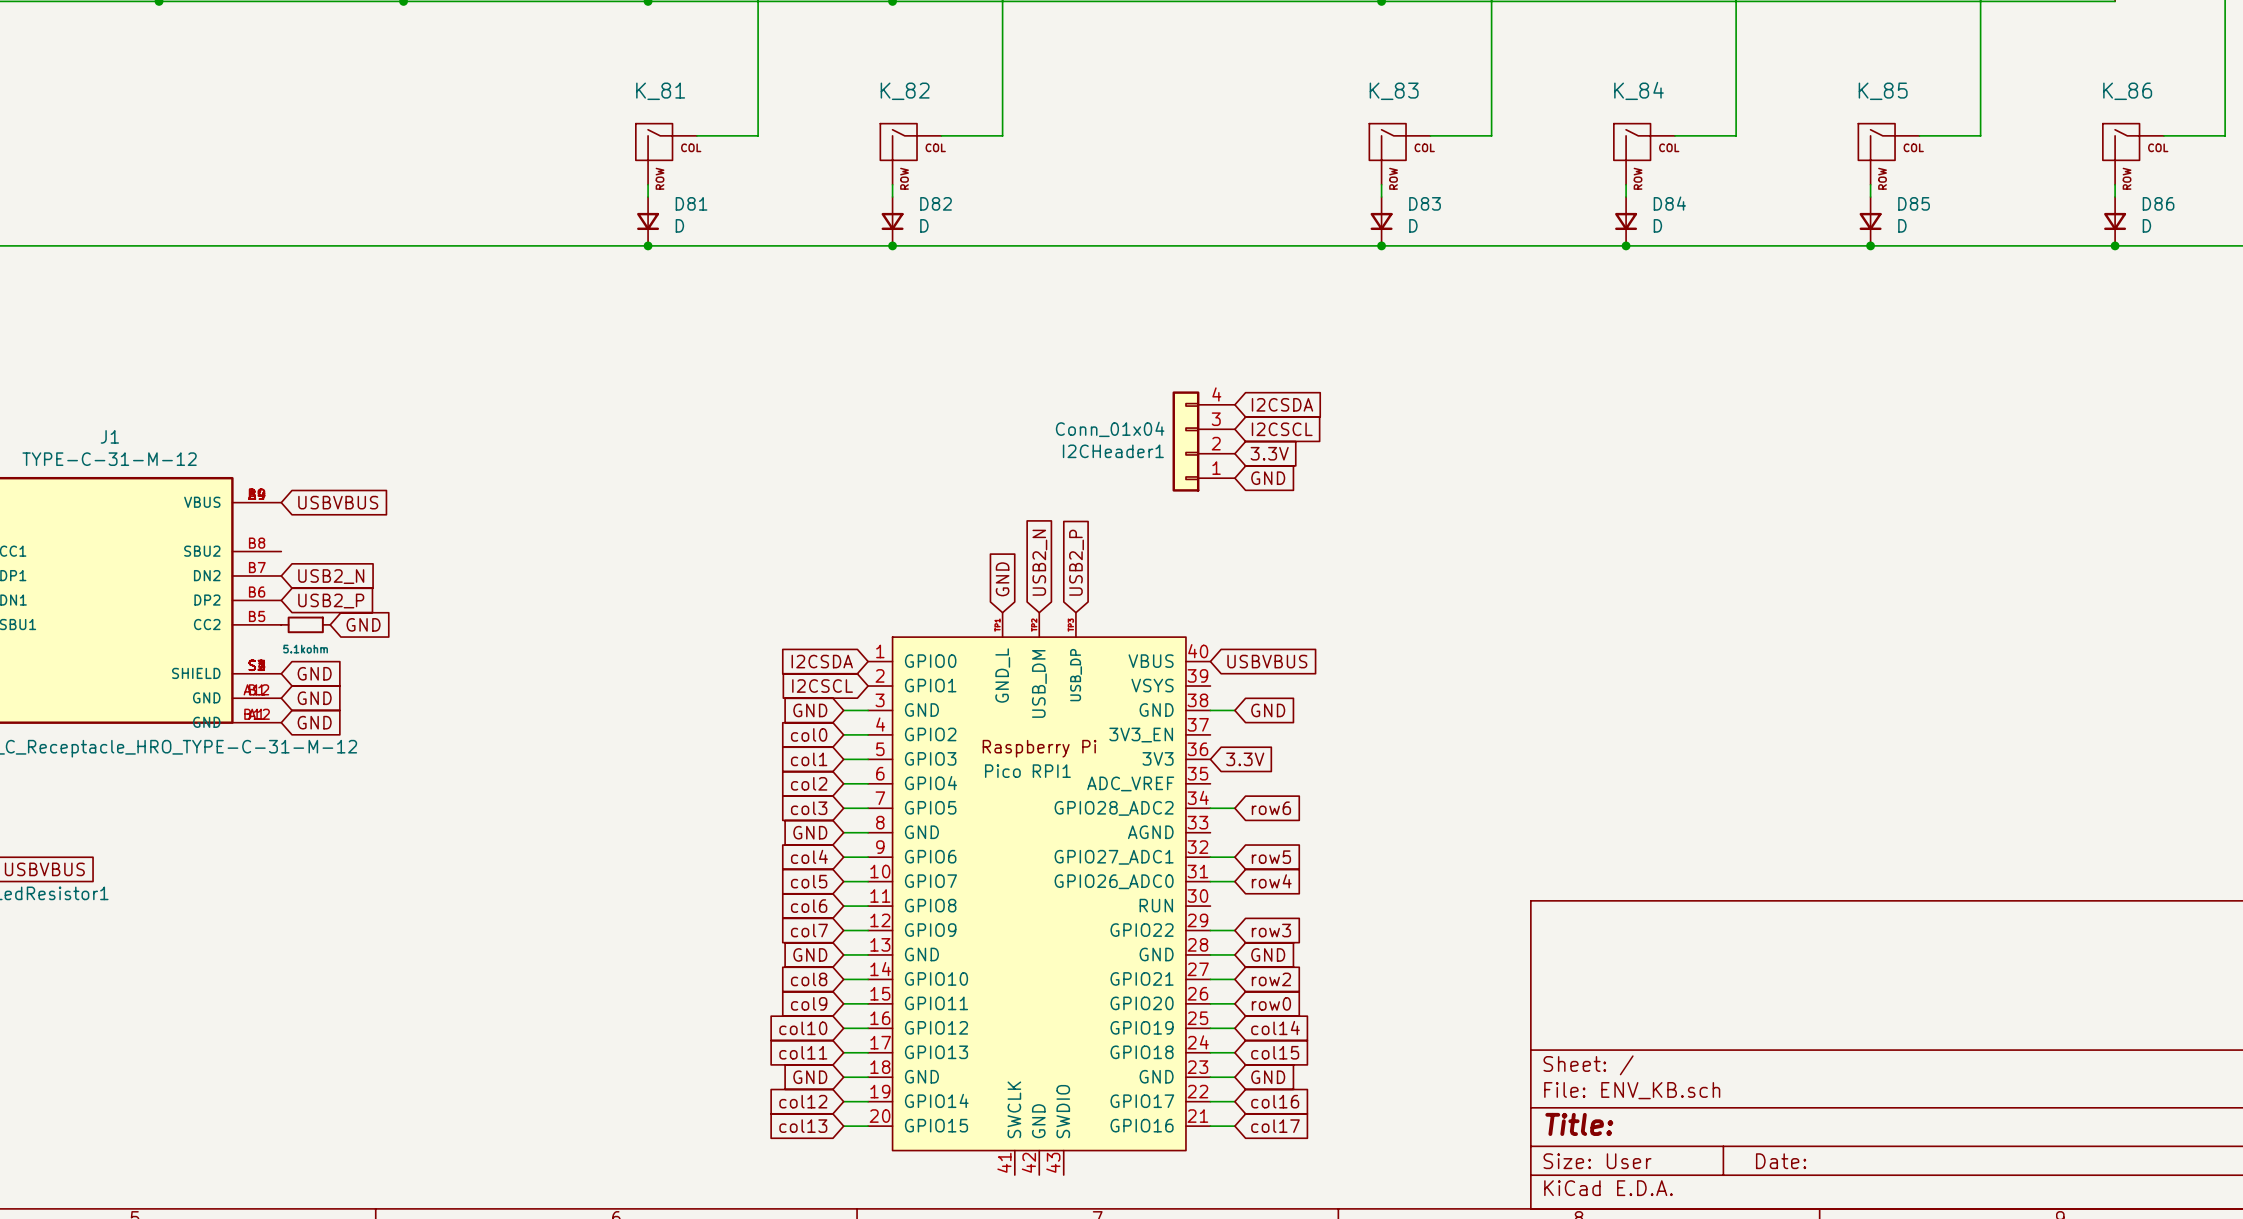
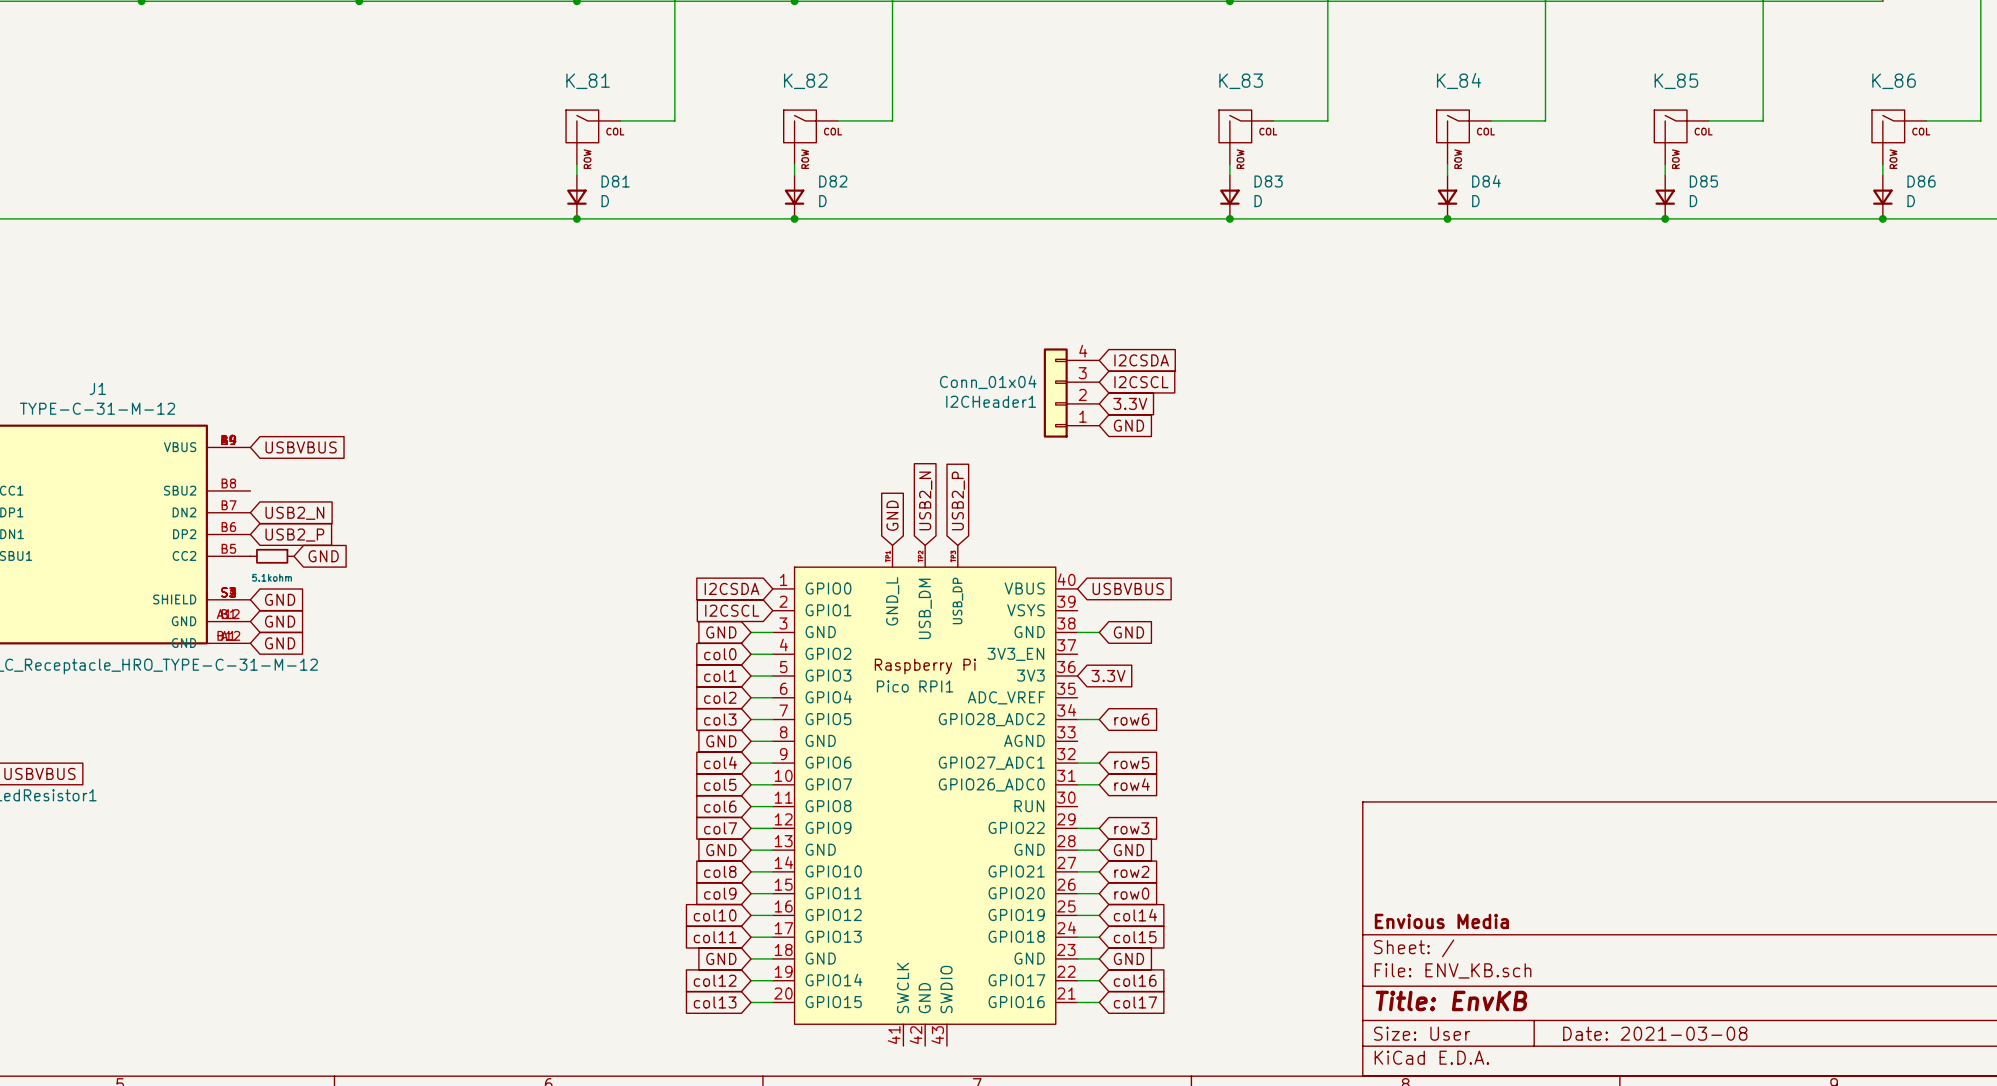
title block: none -> Envious Media (1441, 921)
title block: Title: (1579, 1124) -> Title: EnvKB (1451, 1000)
title block: Date: (1781, 1161) -> Date: 2021-03-08 (1655, 1033)

